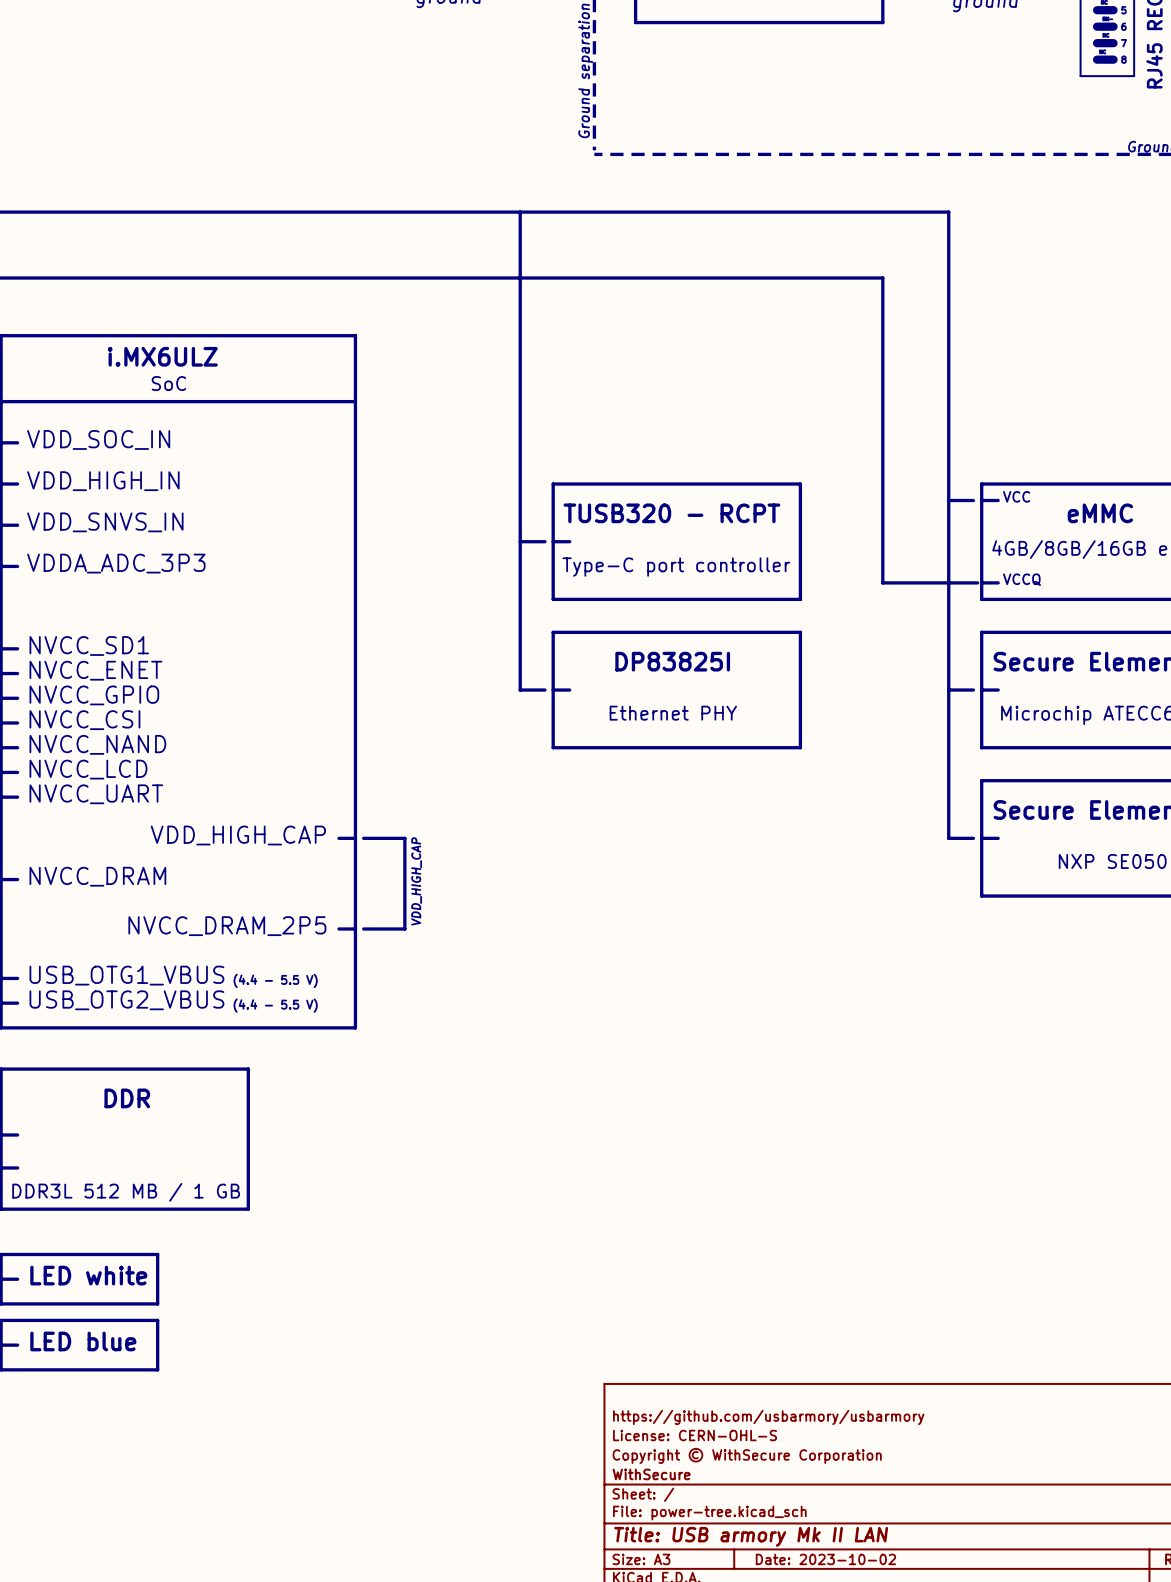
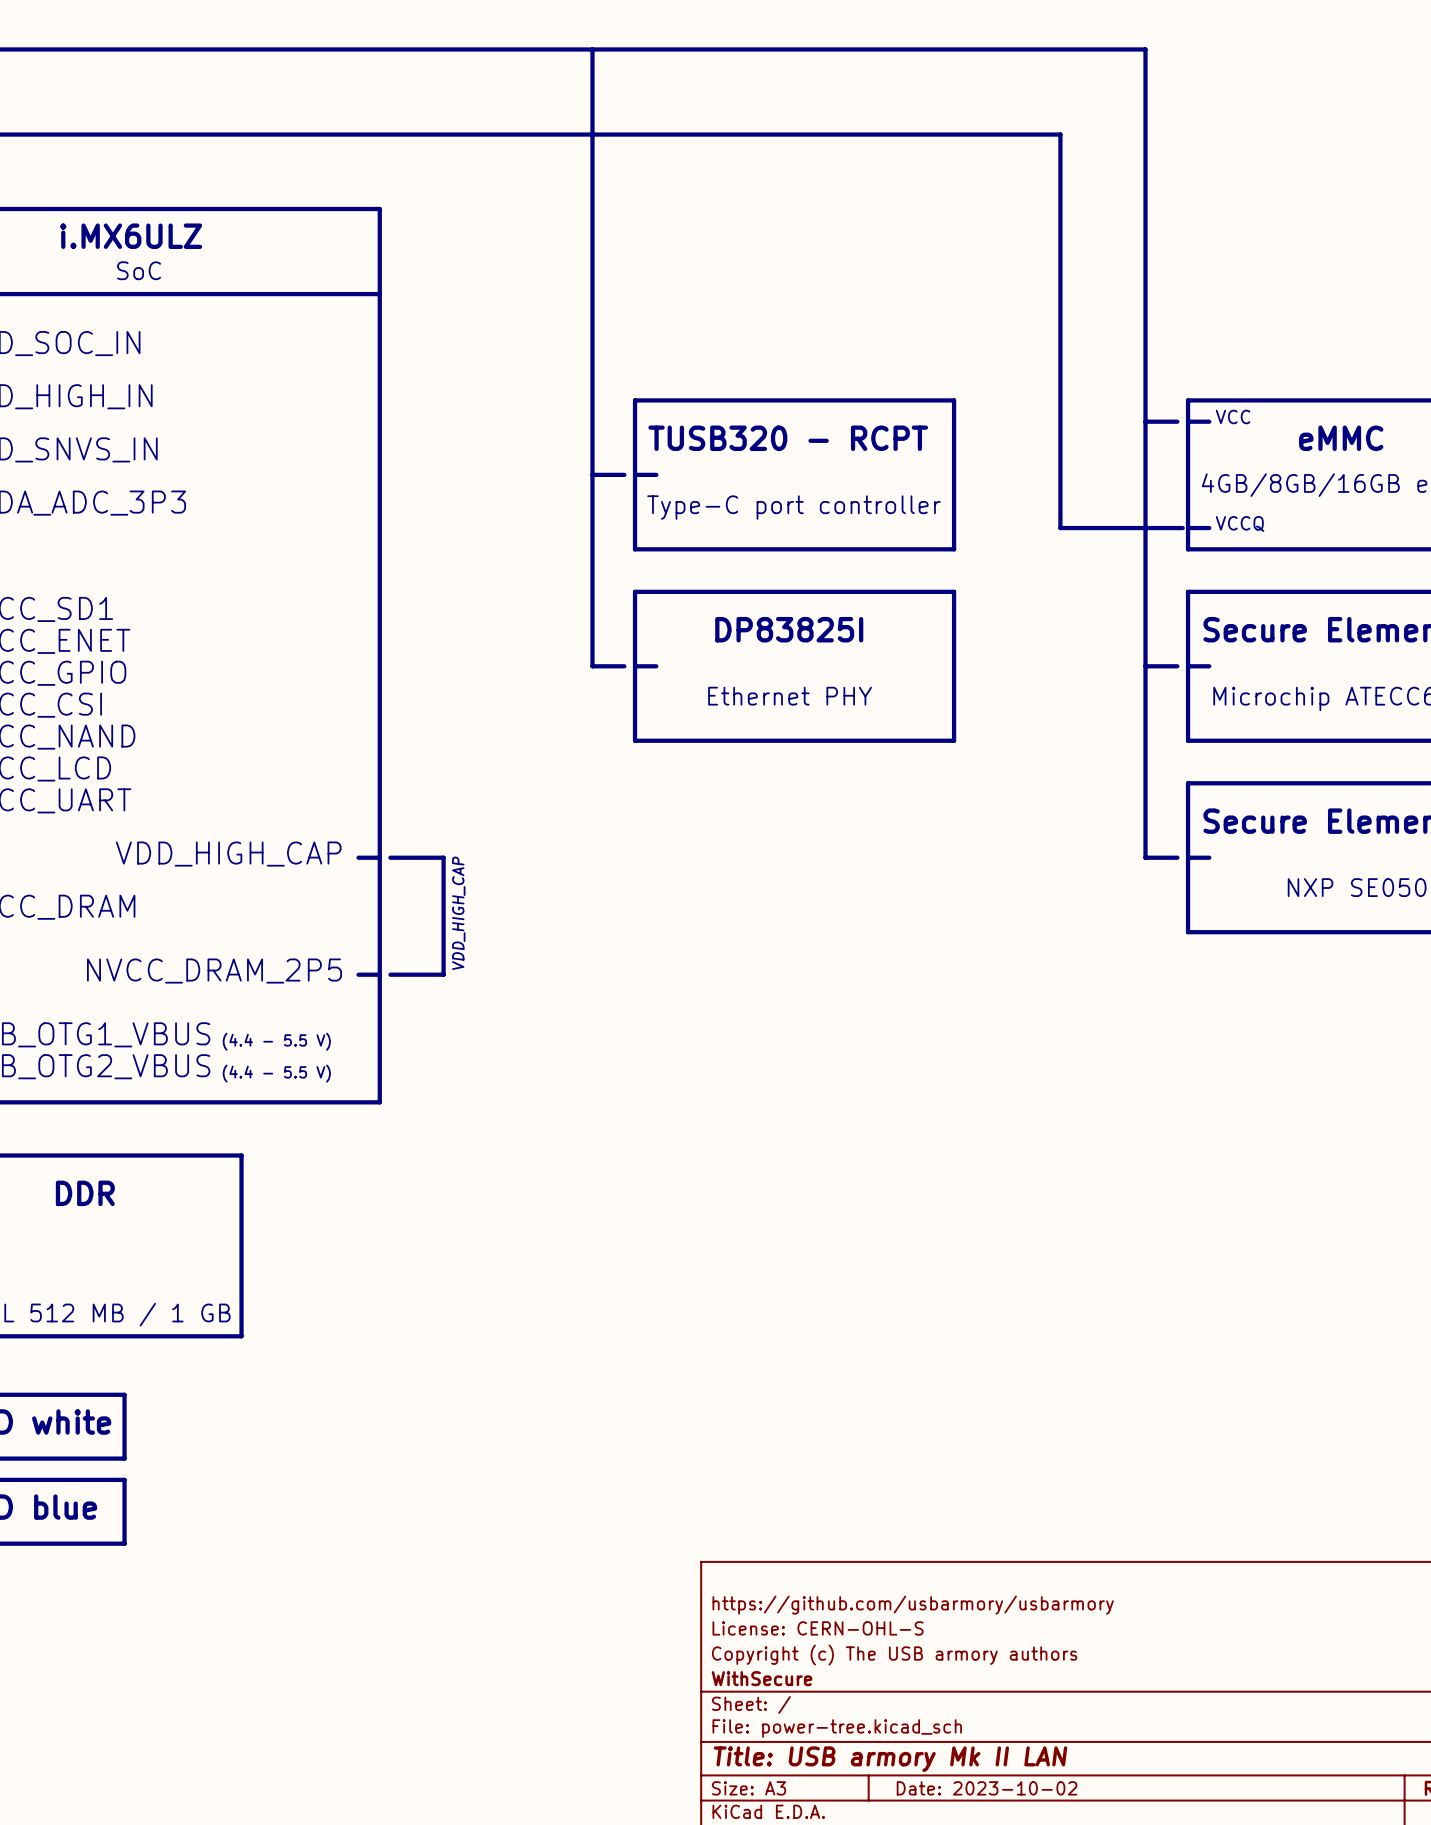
title block: Copyright © WithSecure Corporation (747, 1455) -> Copyright (c) The USB armory authors (894, 1655)

